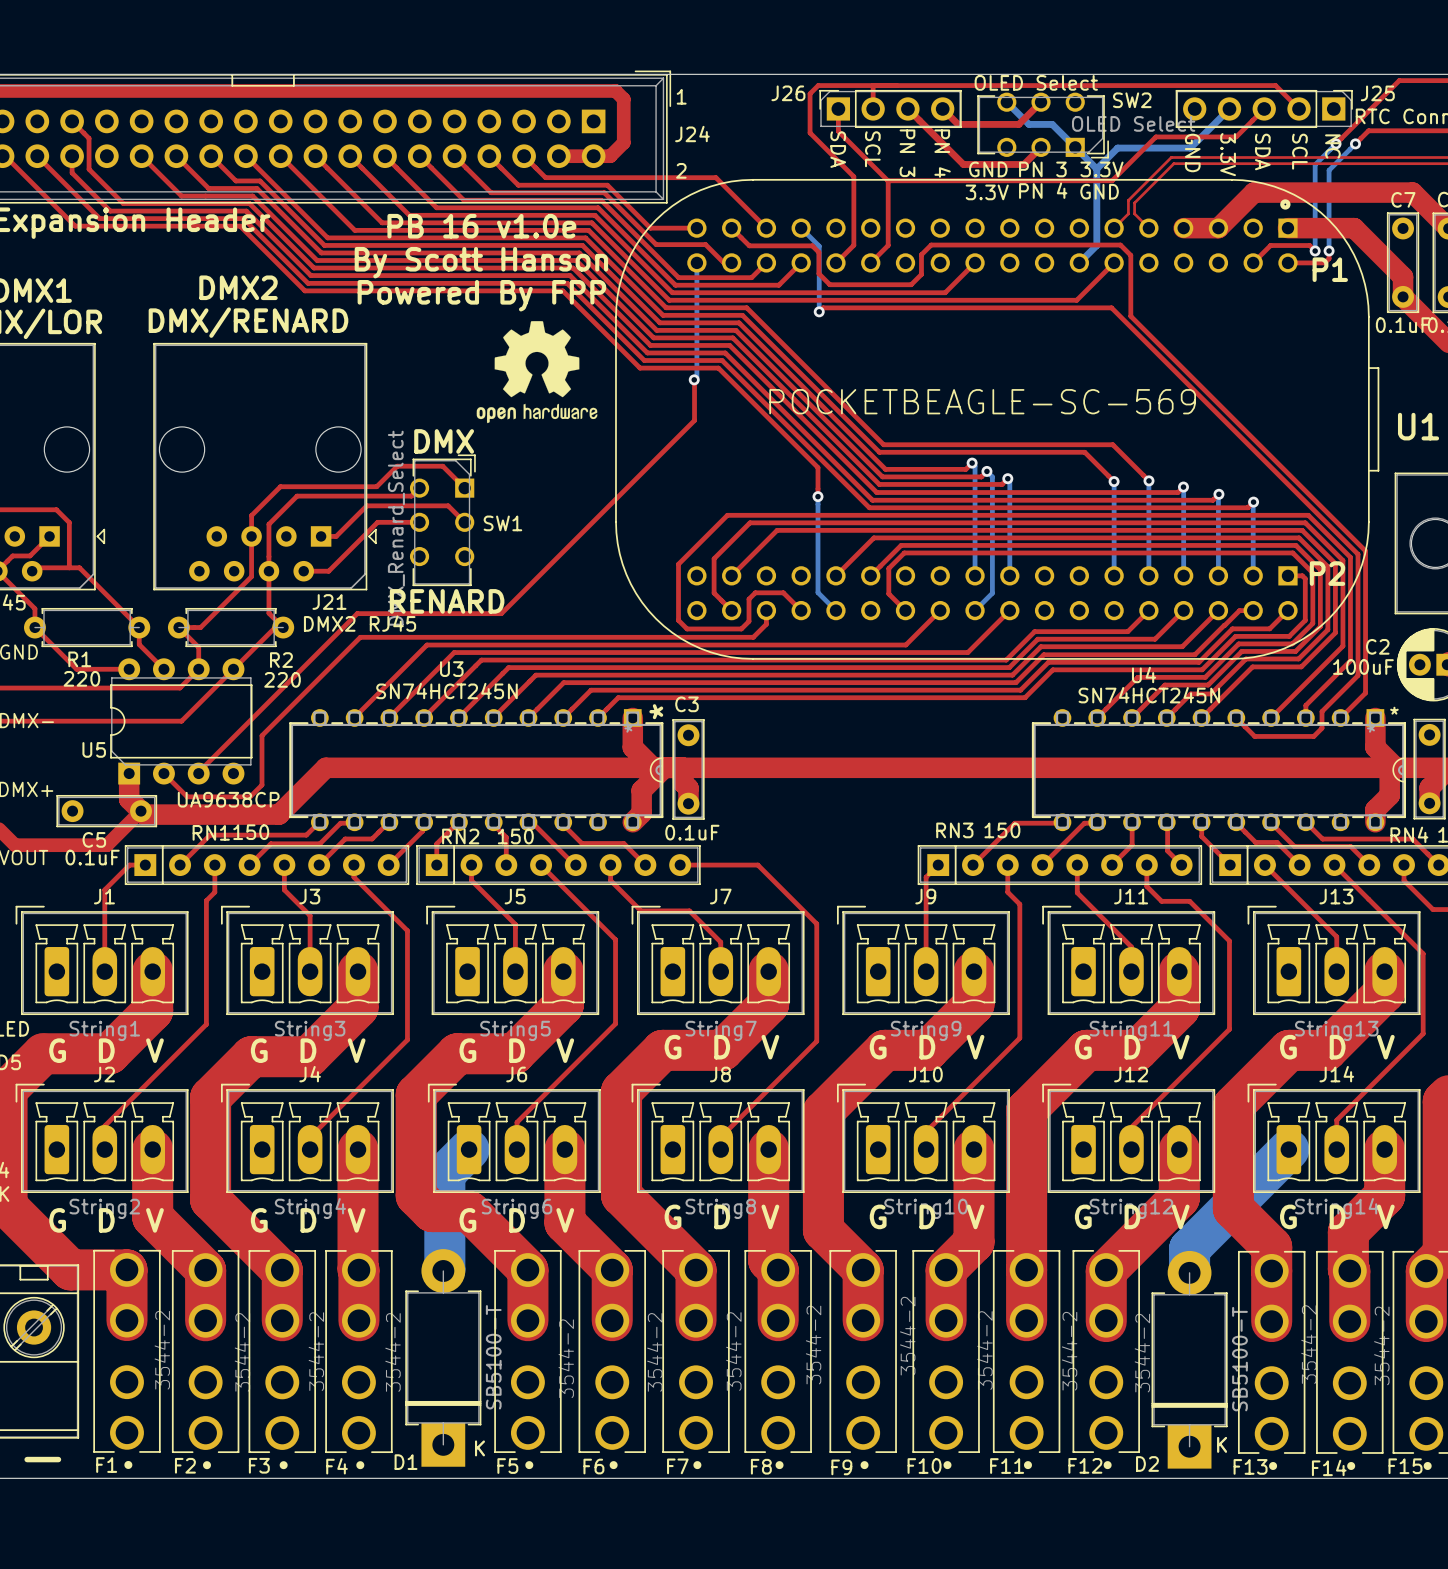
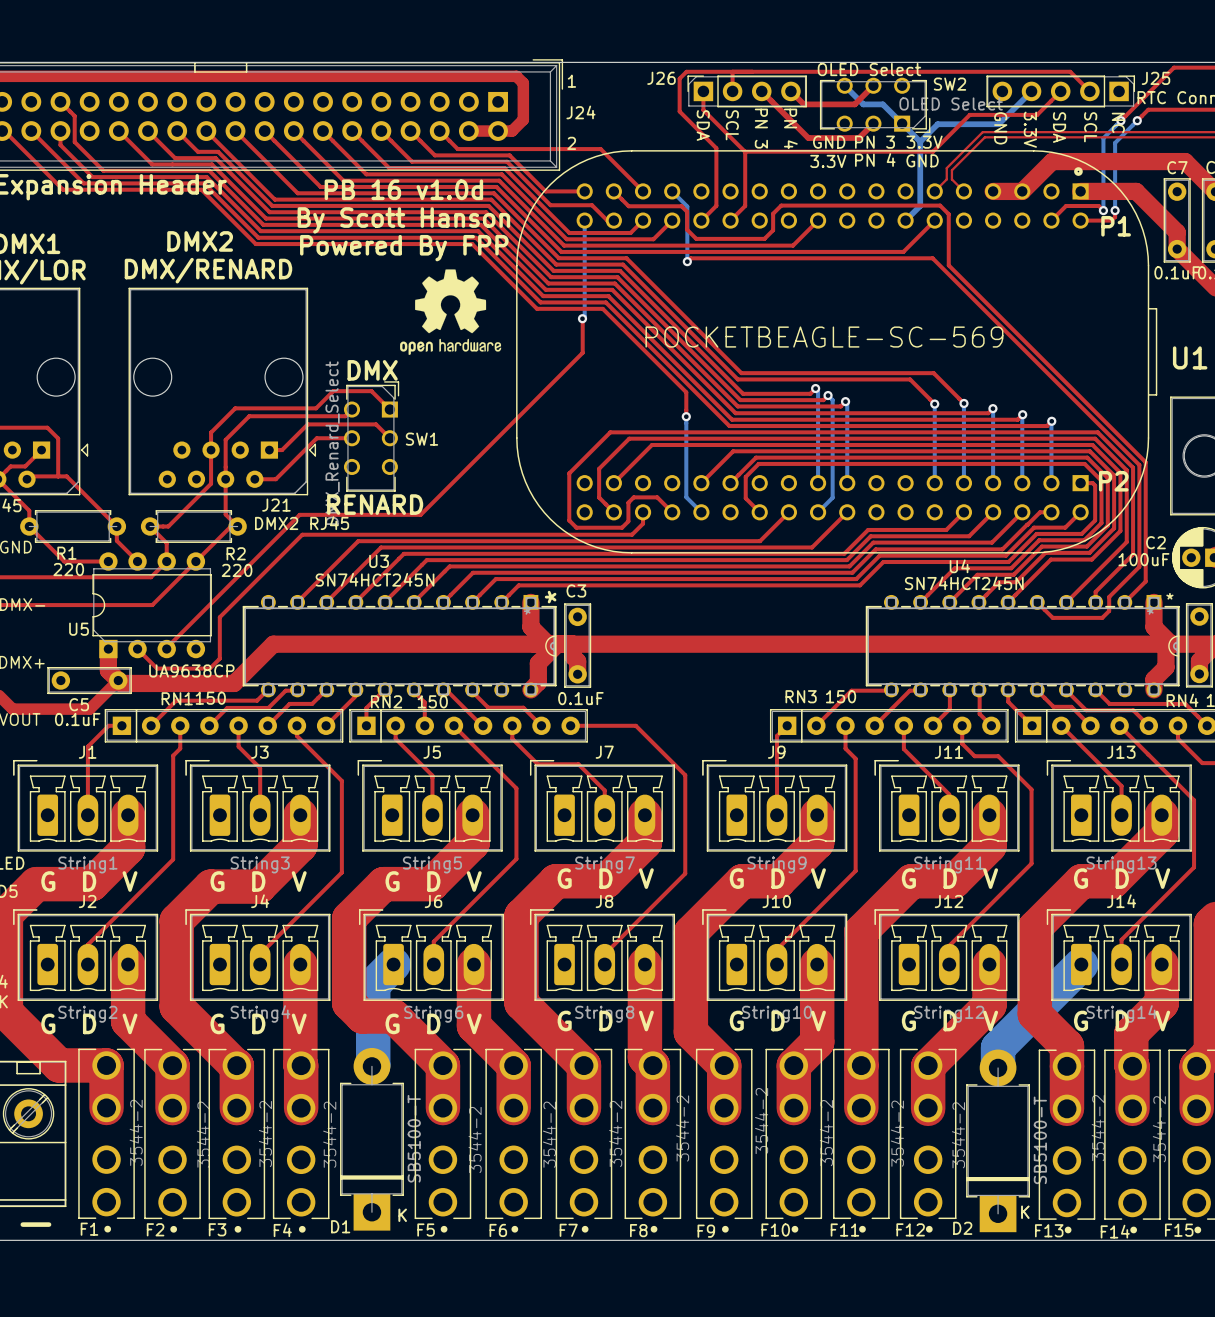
text: PB 16 v1.0e (481, 226) -> PB 16 v1.0d (403, 189)

